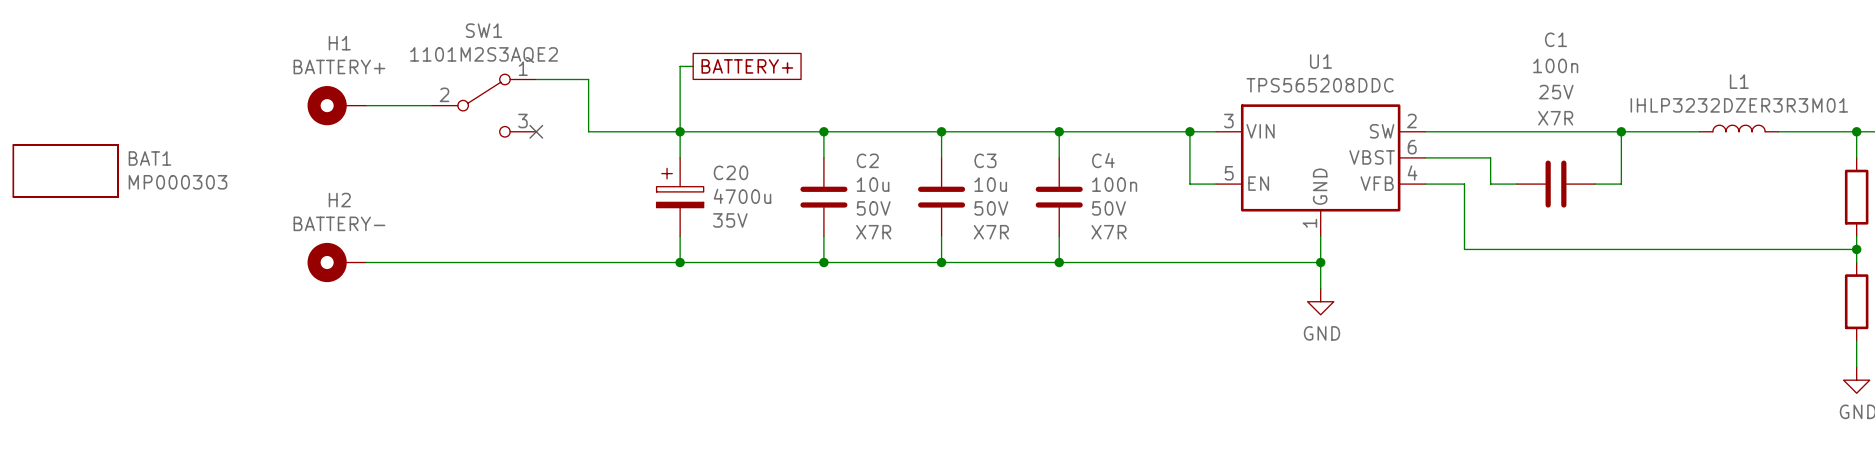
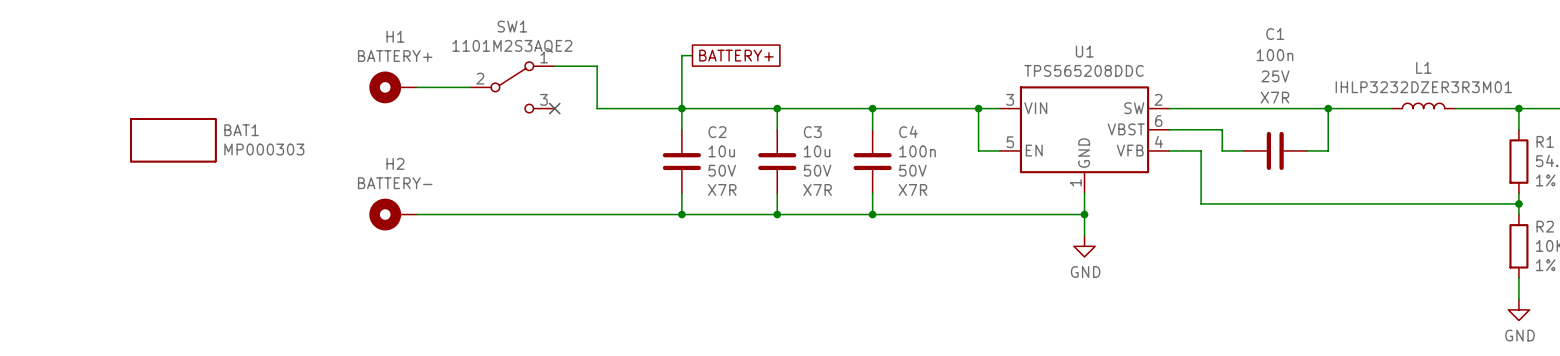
wire: (693, 66) (680, 66) (680, 157) -> none
global label position: BATTERY+ (747, 66) -> BATTERY+ (736, 55)
wire: none -> (692, 55) (681, 55) (681, 108)
wire: (536, 79) (588, 79) (588, 131) (719, 131) -> (554, 66) (597, 66) (597, 108)
H1 position: (336, 105) -> (393, 87)
wire: (366, 105) (431, 105) -> (417, 87) (469, 87)
SW1 position: (484, 105) -> (512, 87)
no-connect mark: (536, 131) -> none
no-connect mark: none -> (554, 108)
junction: (680, 131) -> none
BAT1 position: (65, 171) -> (173, 140)
C20: 4700u (680, 197) -> none
wire: (680, 236) (680, 262) -> none
H2 position: (336, 262) -> (393, 214)
wire: (366, 262) (497, 262) -> none
junction: (680, 262) -> none

